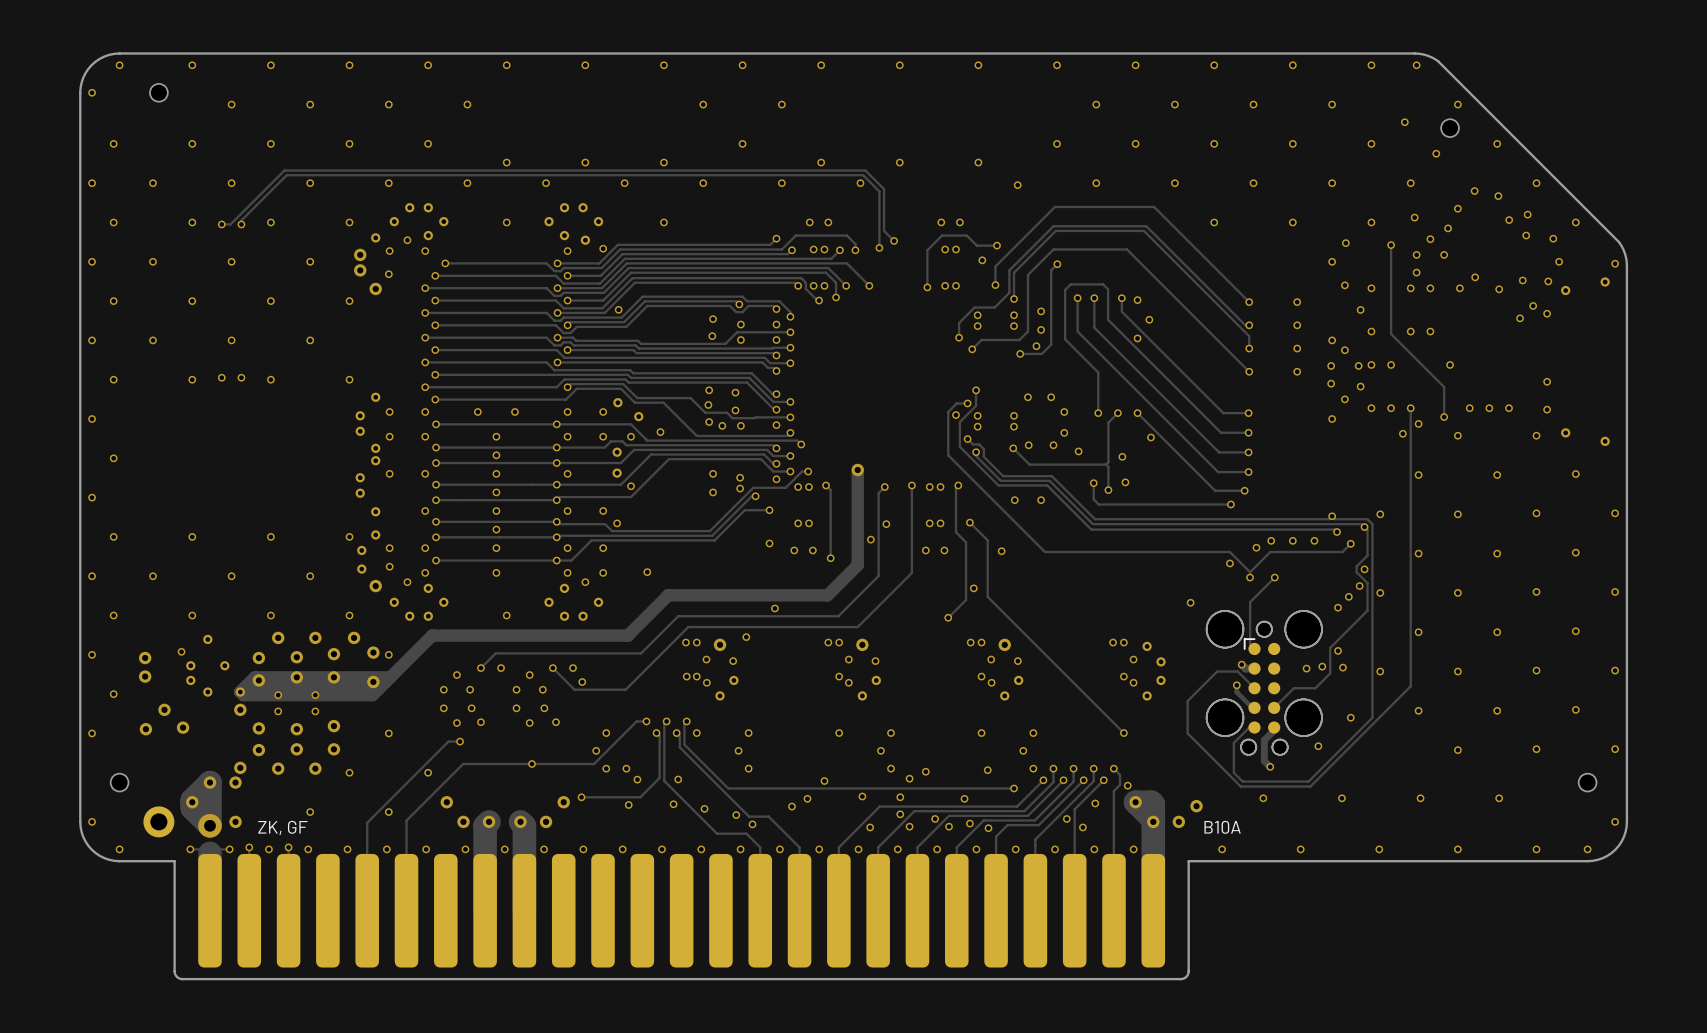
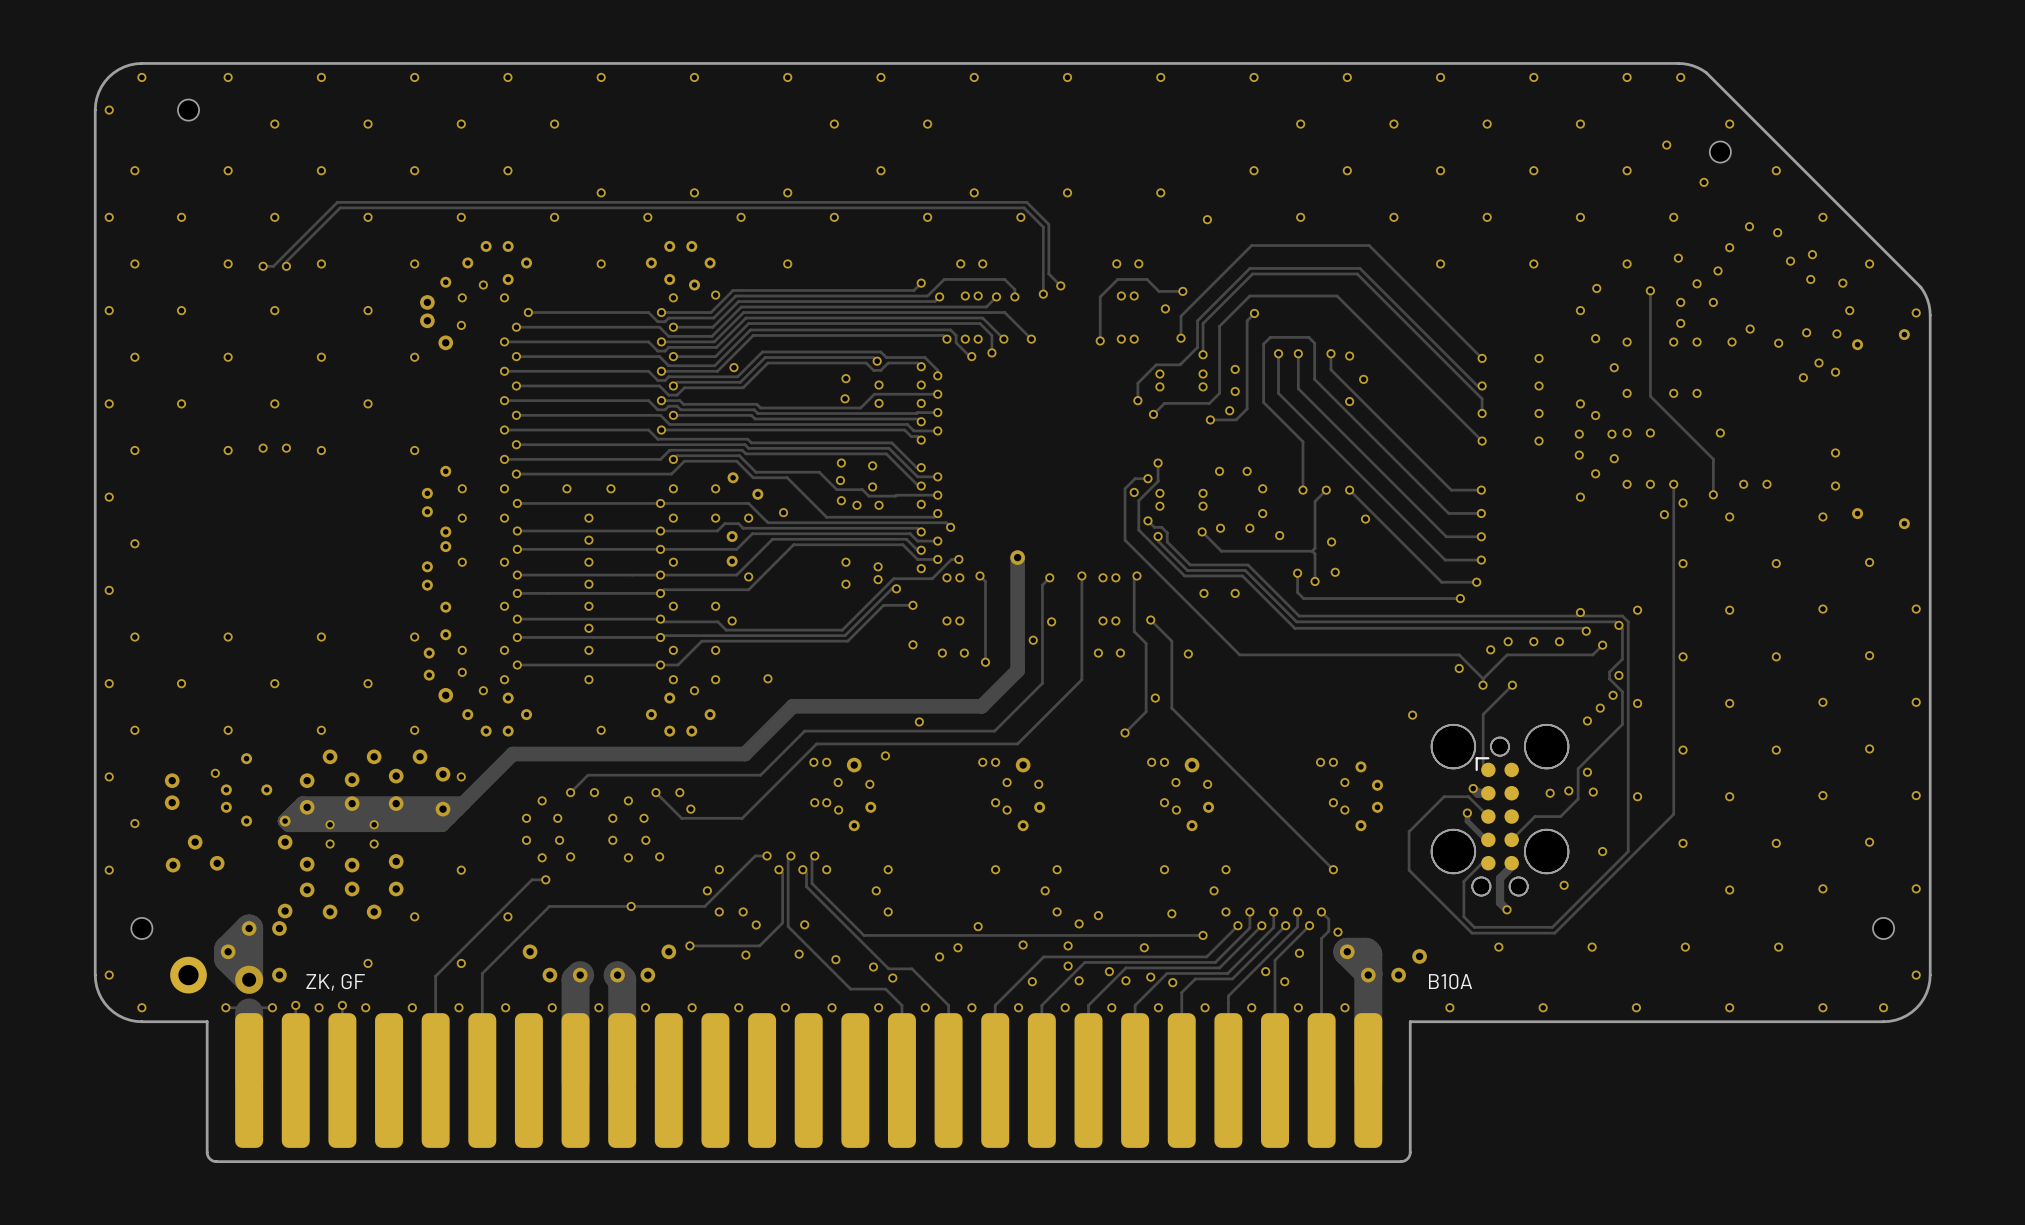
via: (1509, 408) -> none

